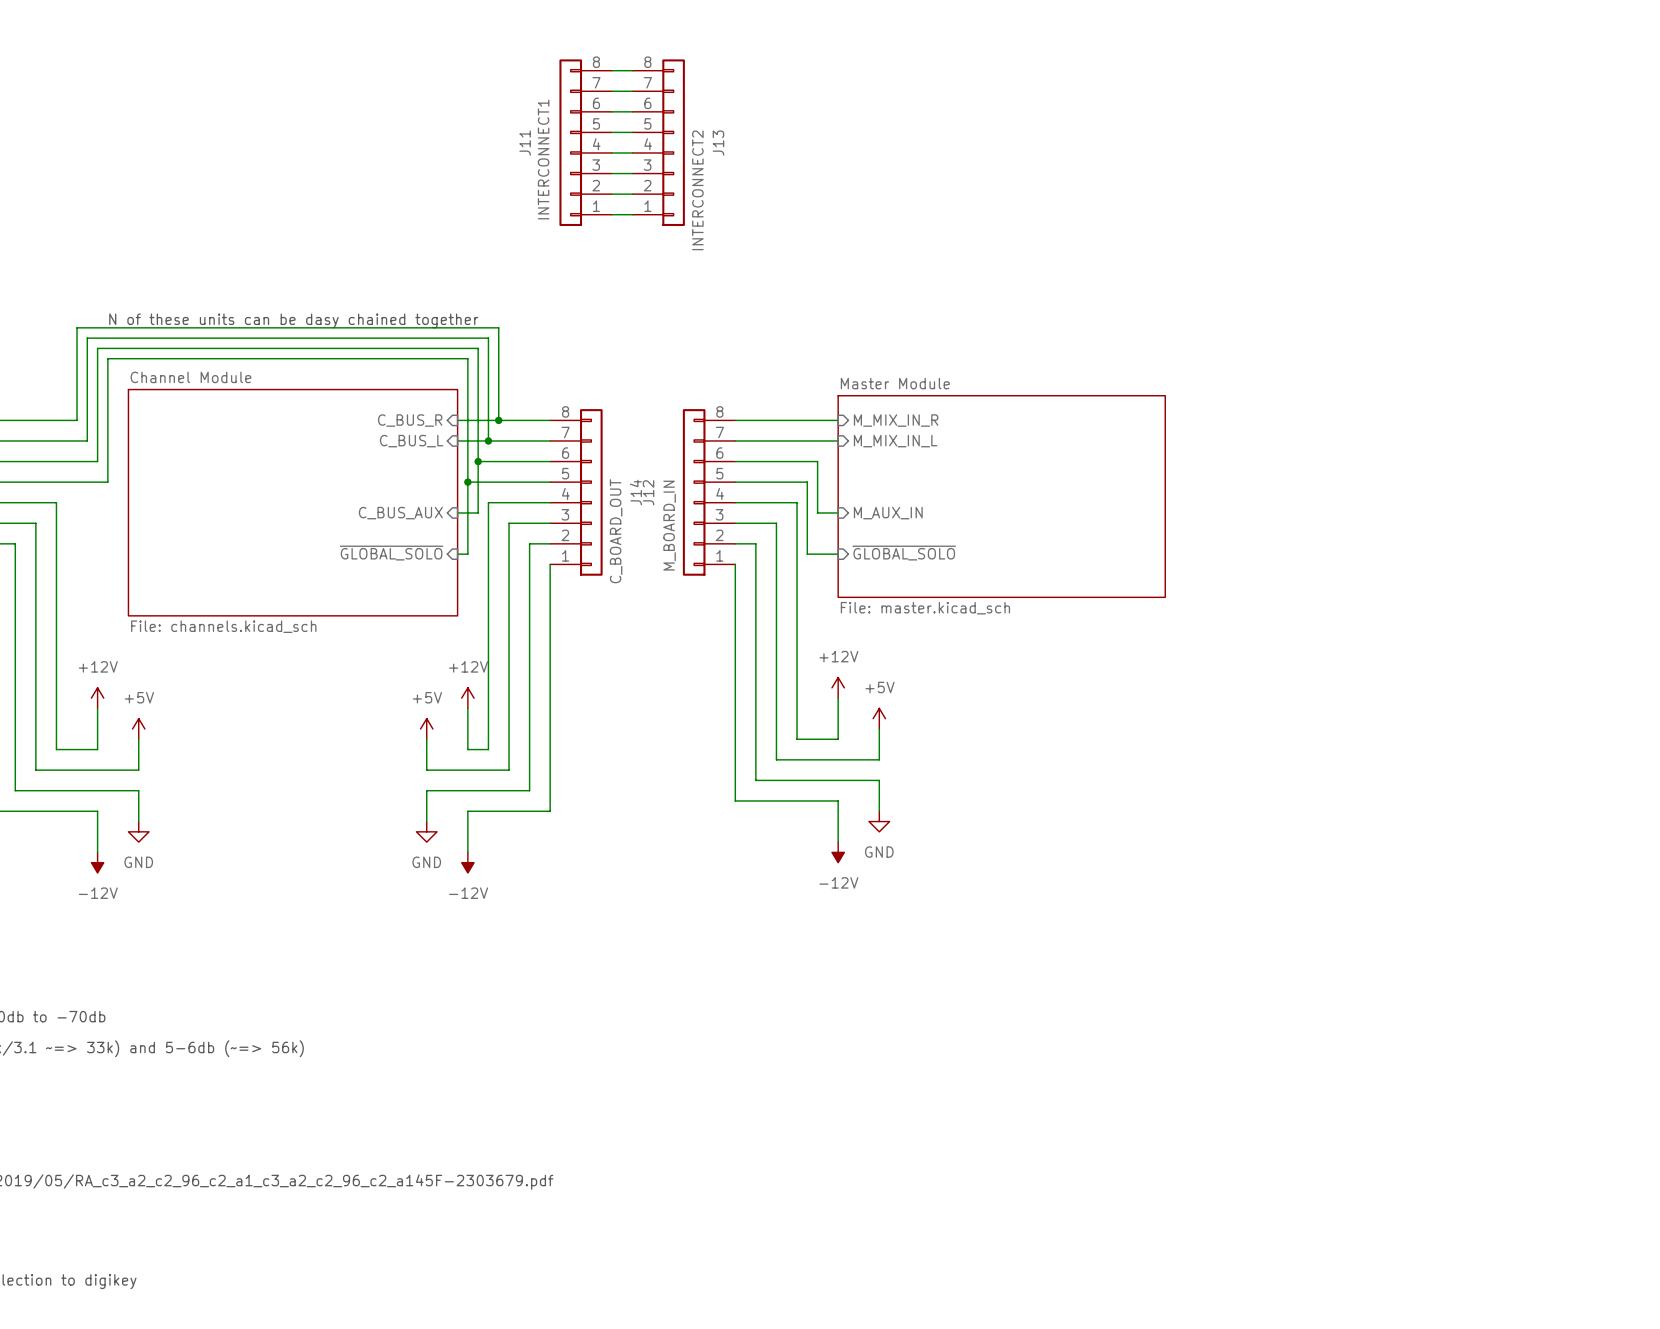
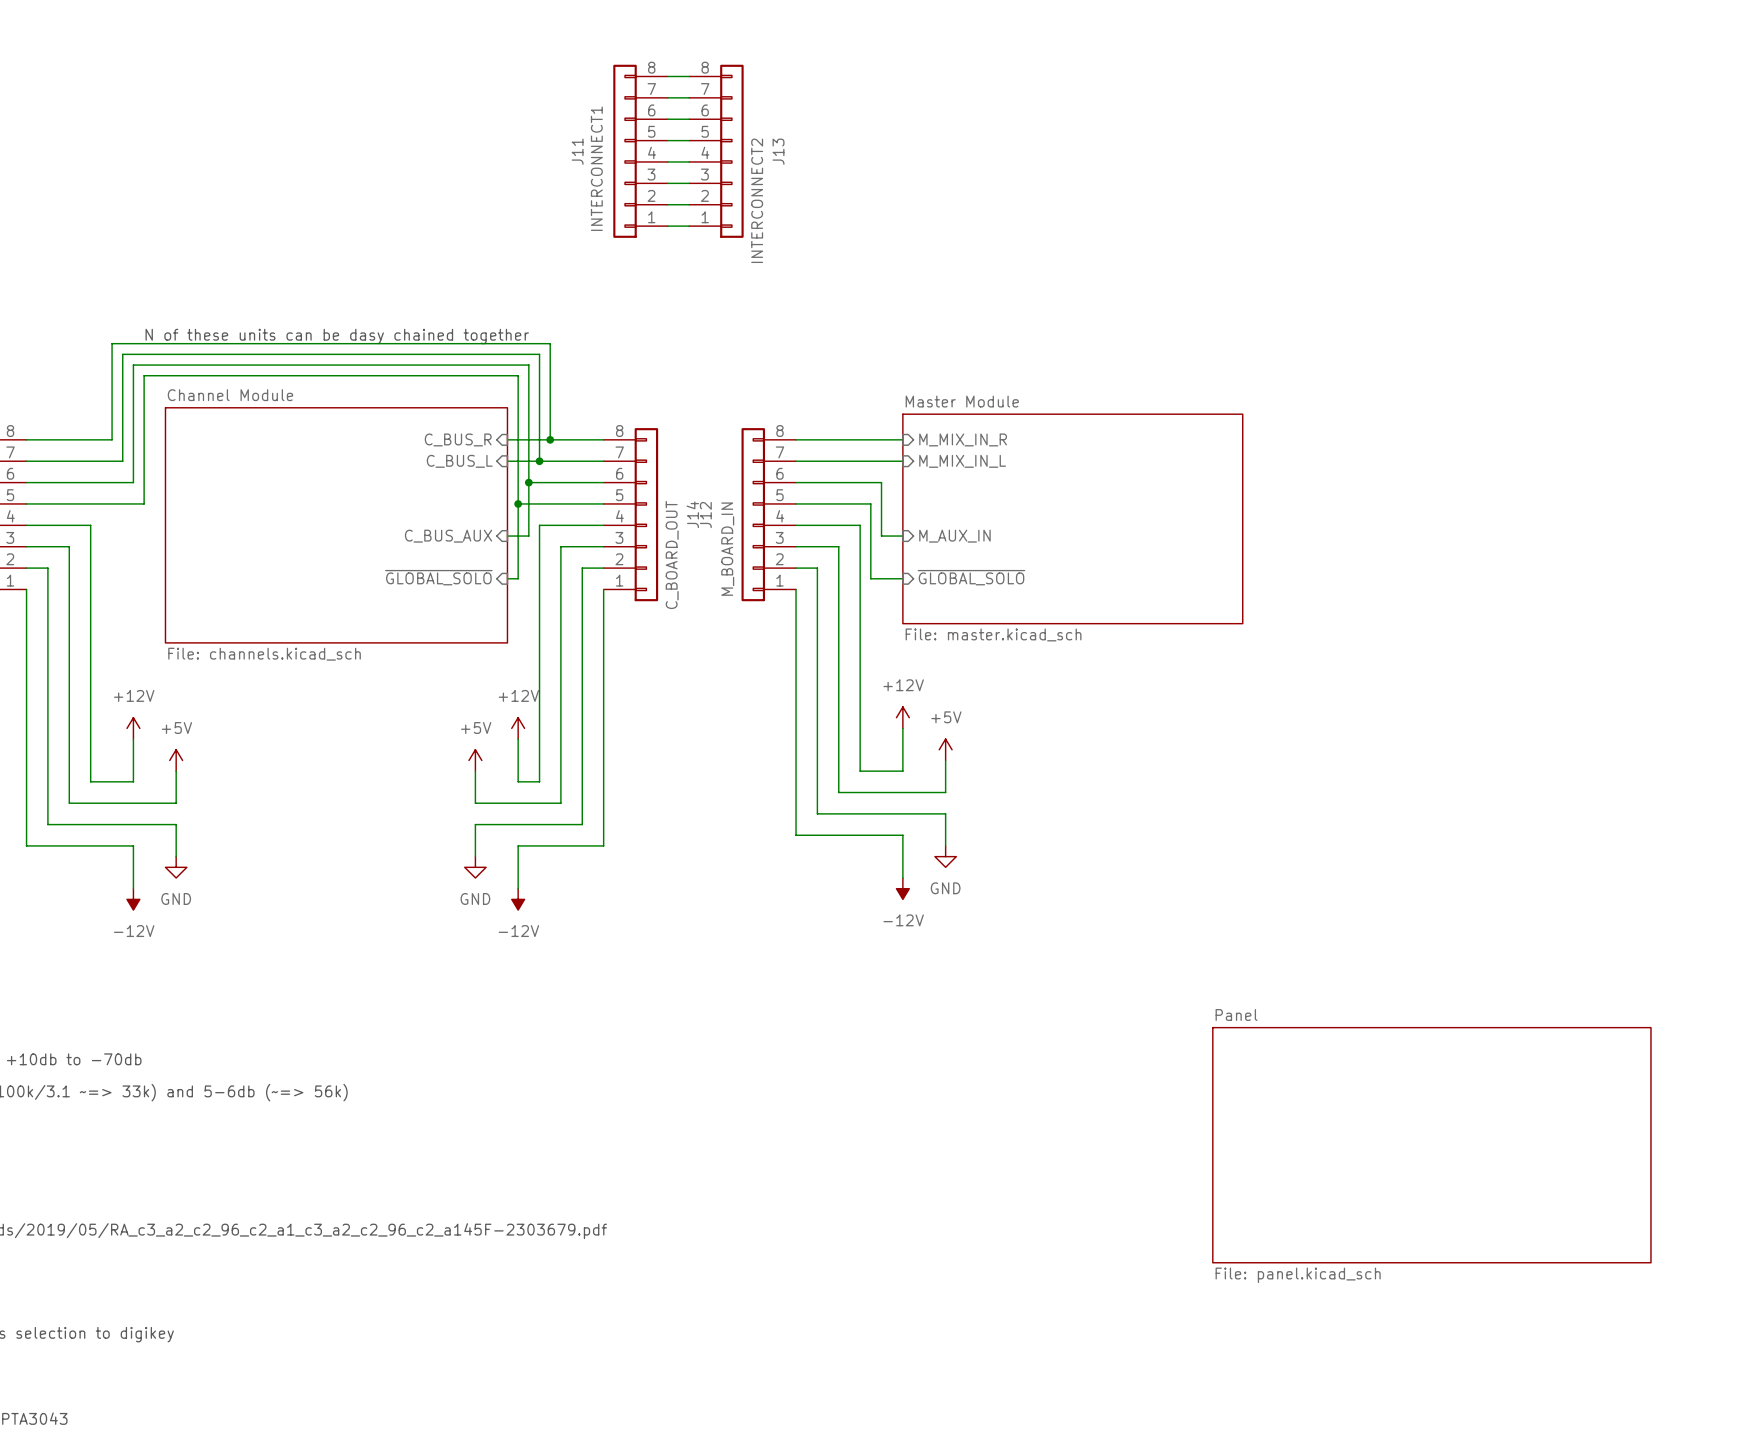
sheet Panel: none -> File: panel.kicad_sch (1431, 1145)

